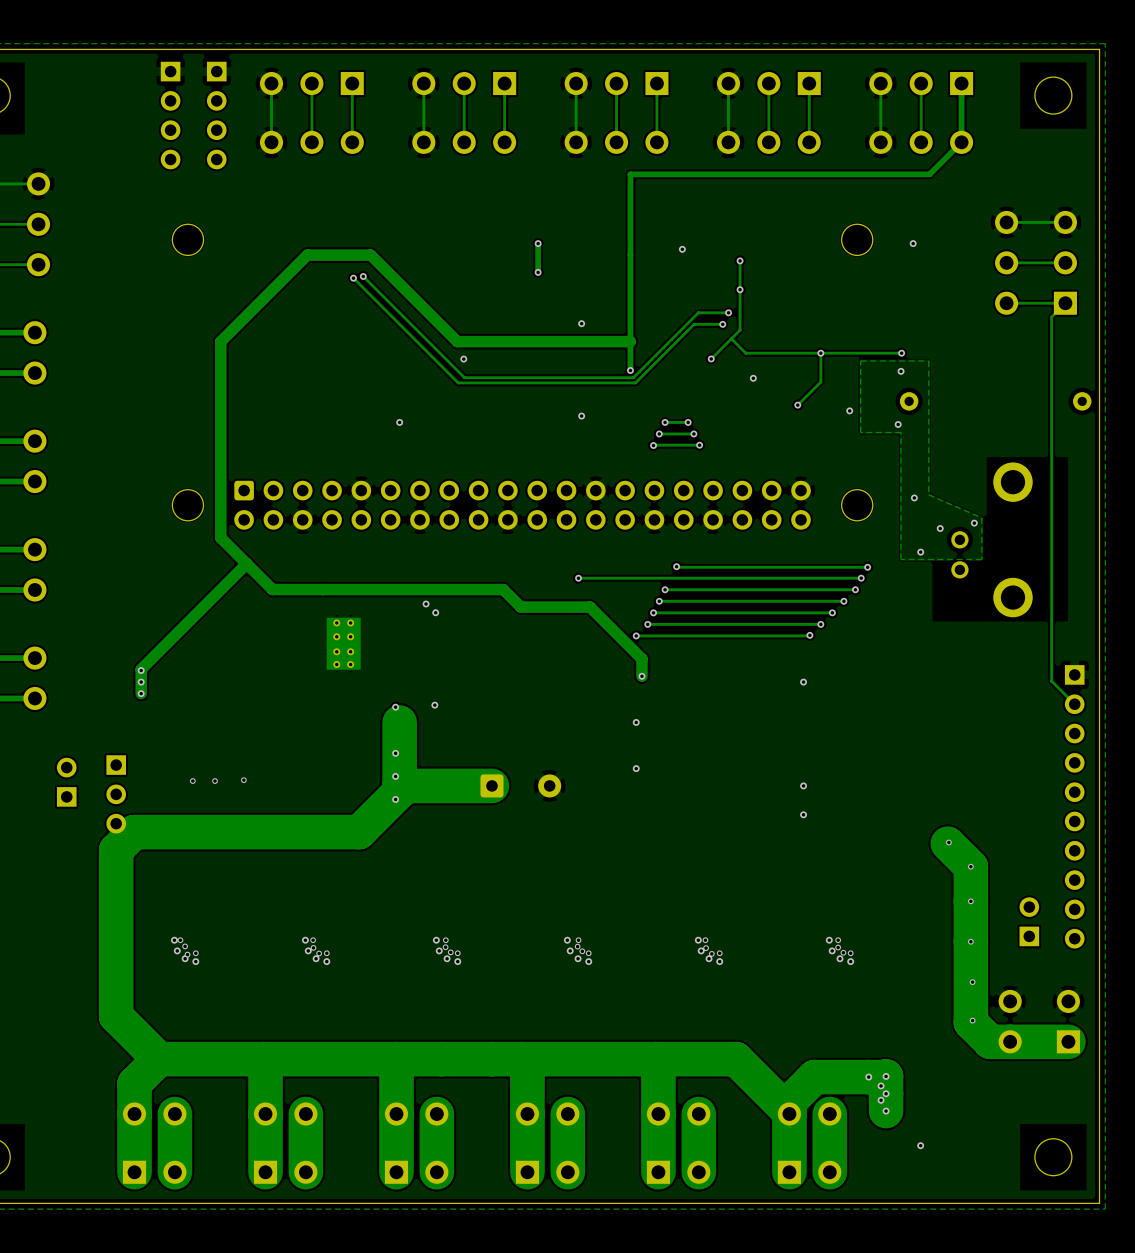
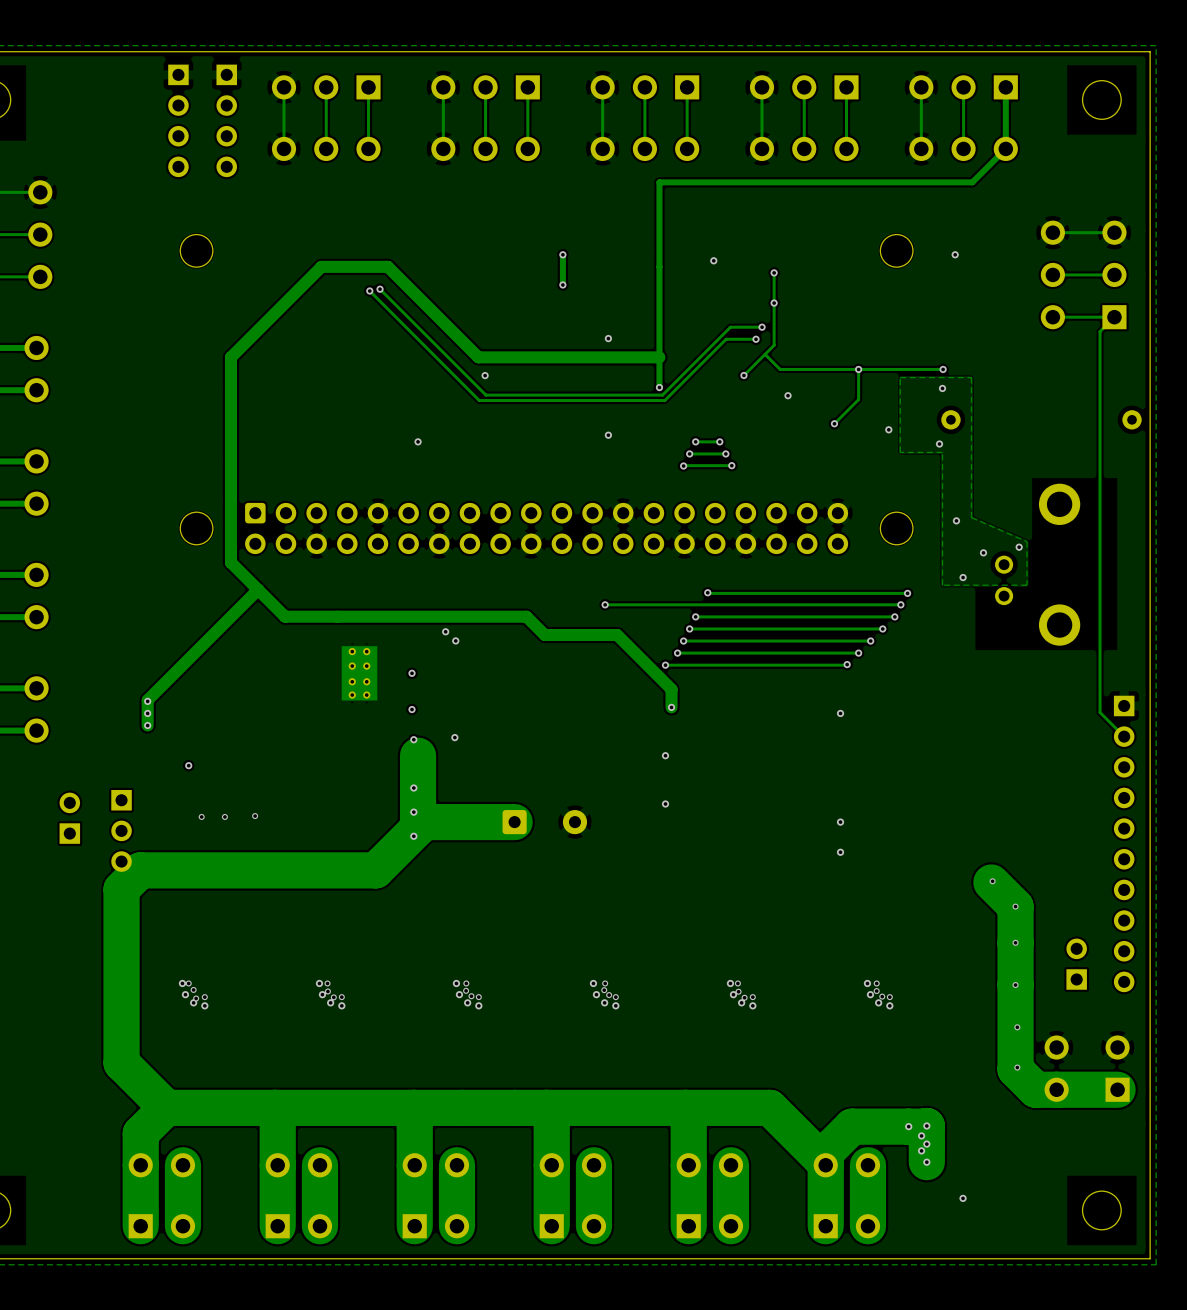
via: none -> (412, 673)
via: none -> (412, 709)
via: none -> (188, 765)

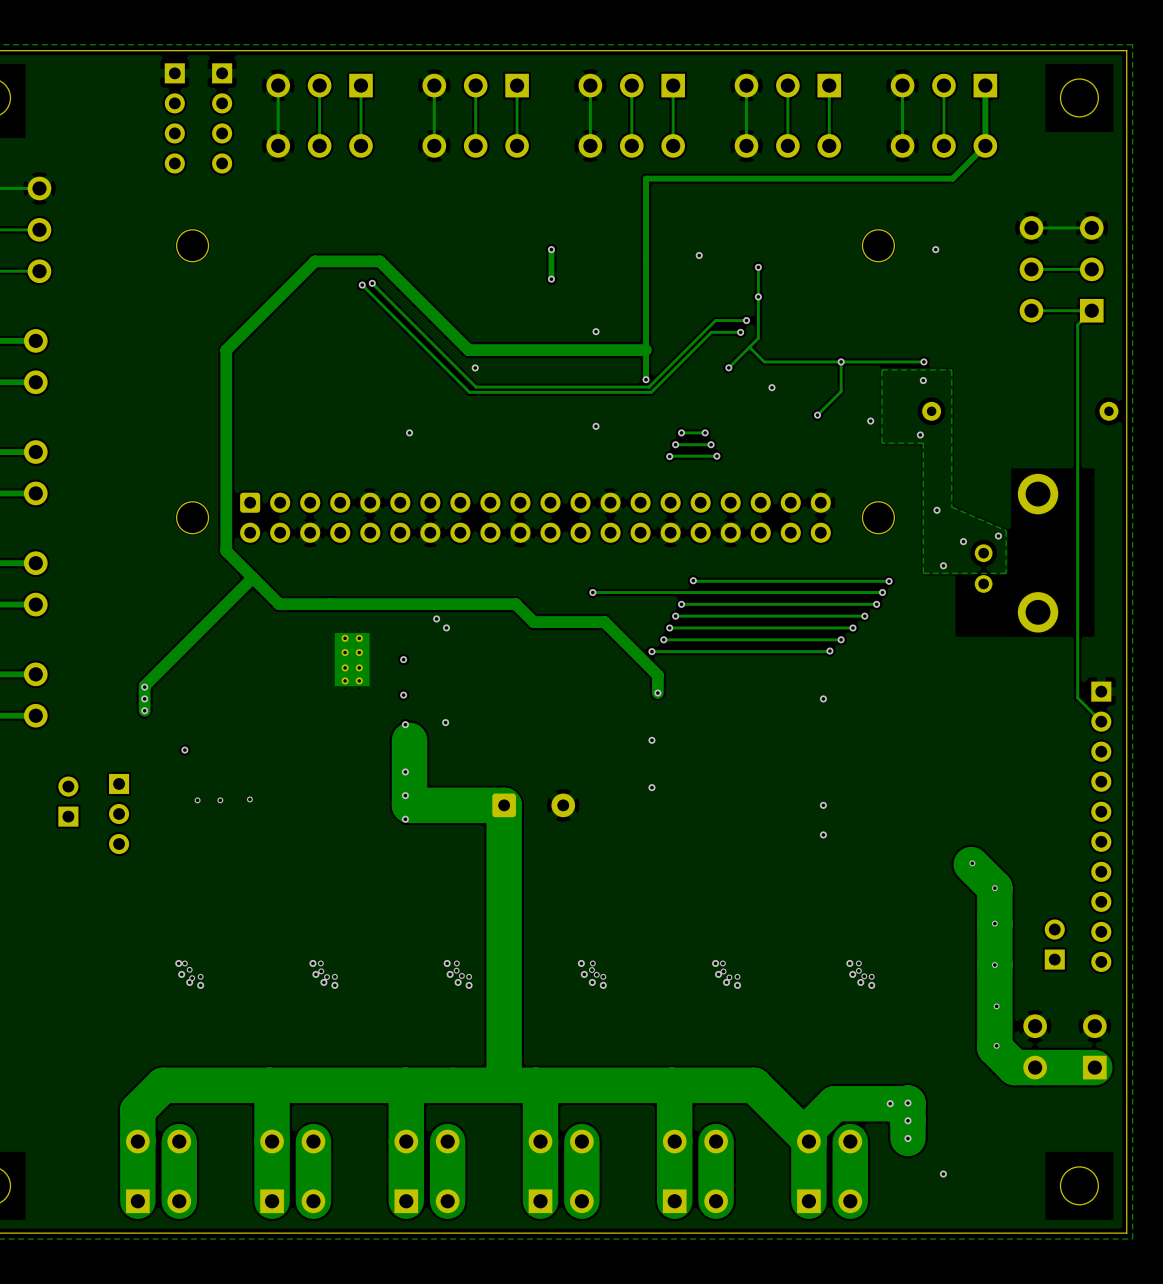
track: (418, 822) (418, 828) (375, 870) (140, 870) (121, 889) (121, 1063) (166, 1107) -> none
track: none -> (504, 805) (504, 1085)
via: (921, 1135) -> none
via: (921, 1150) -> none

